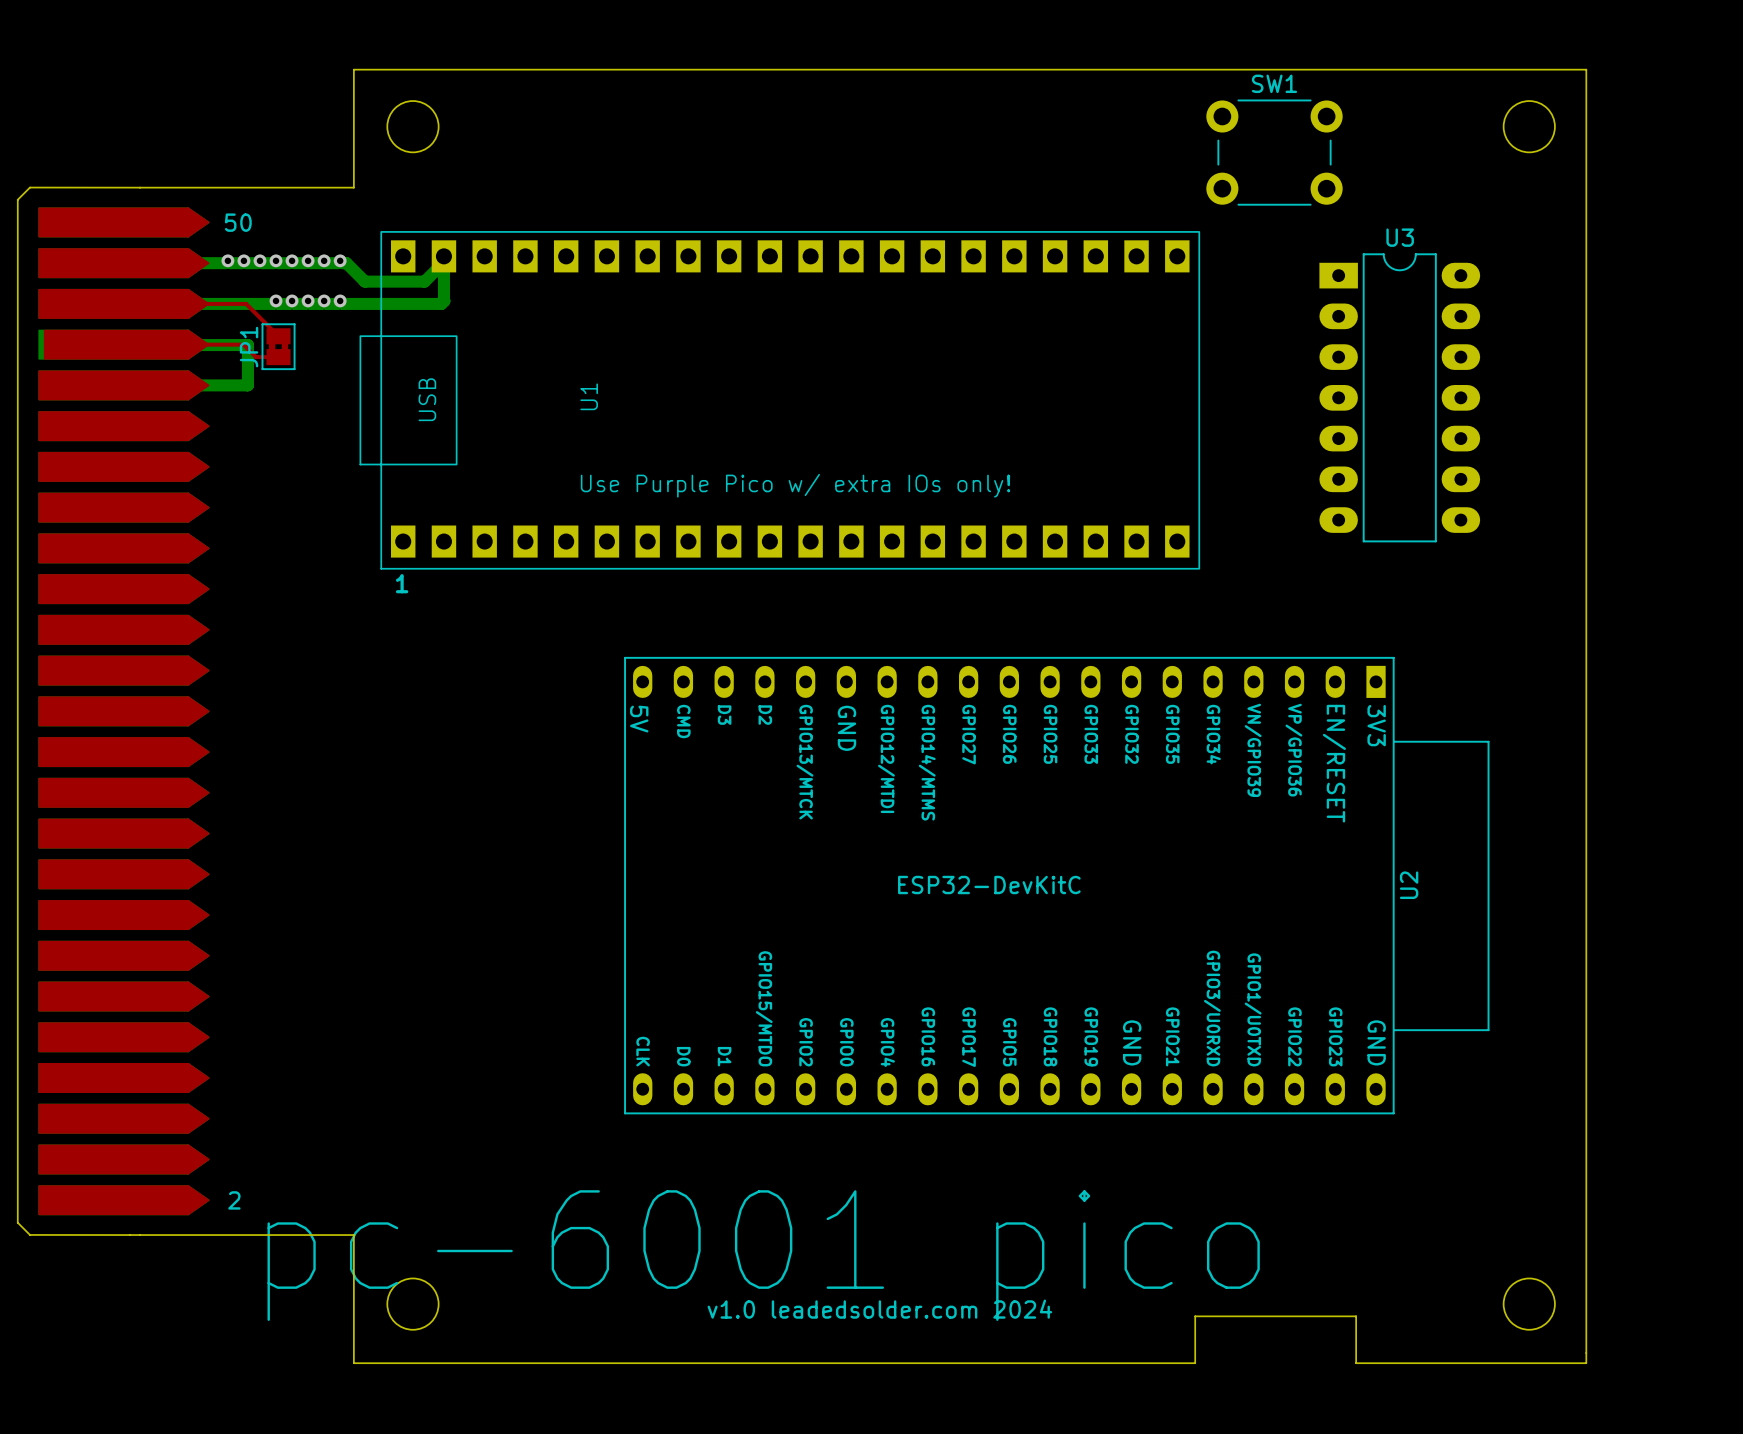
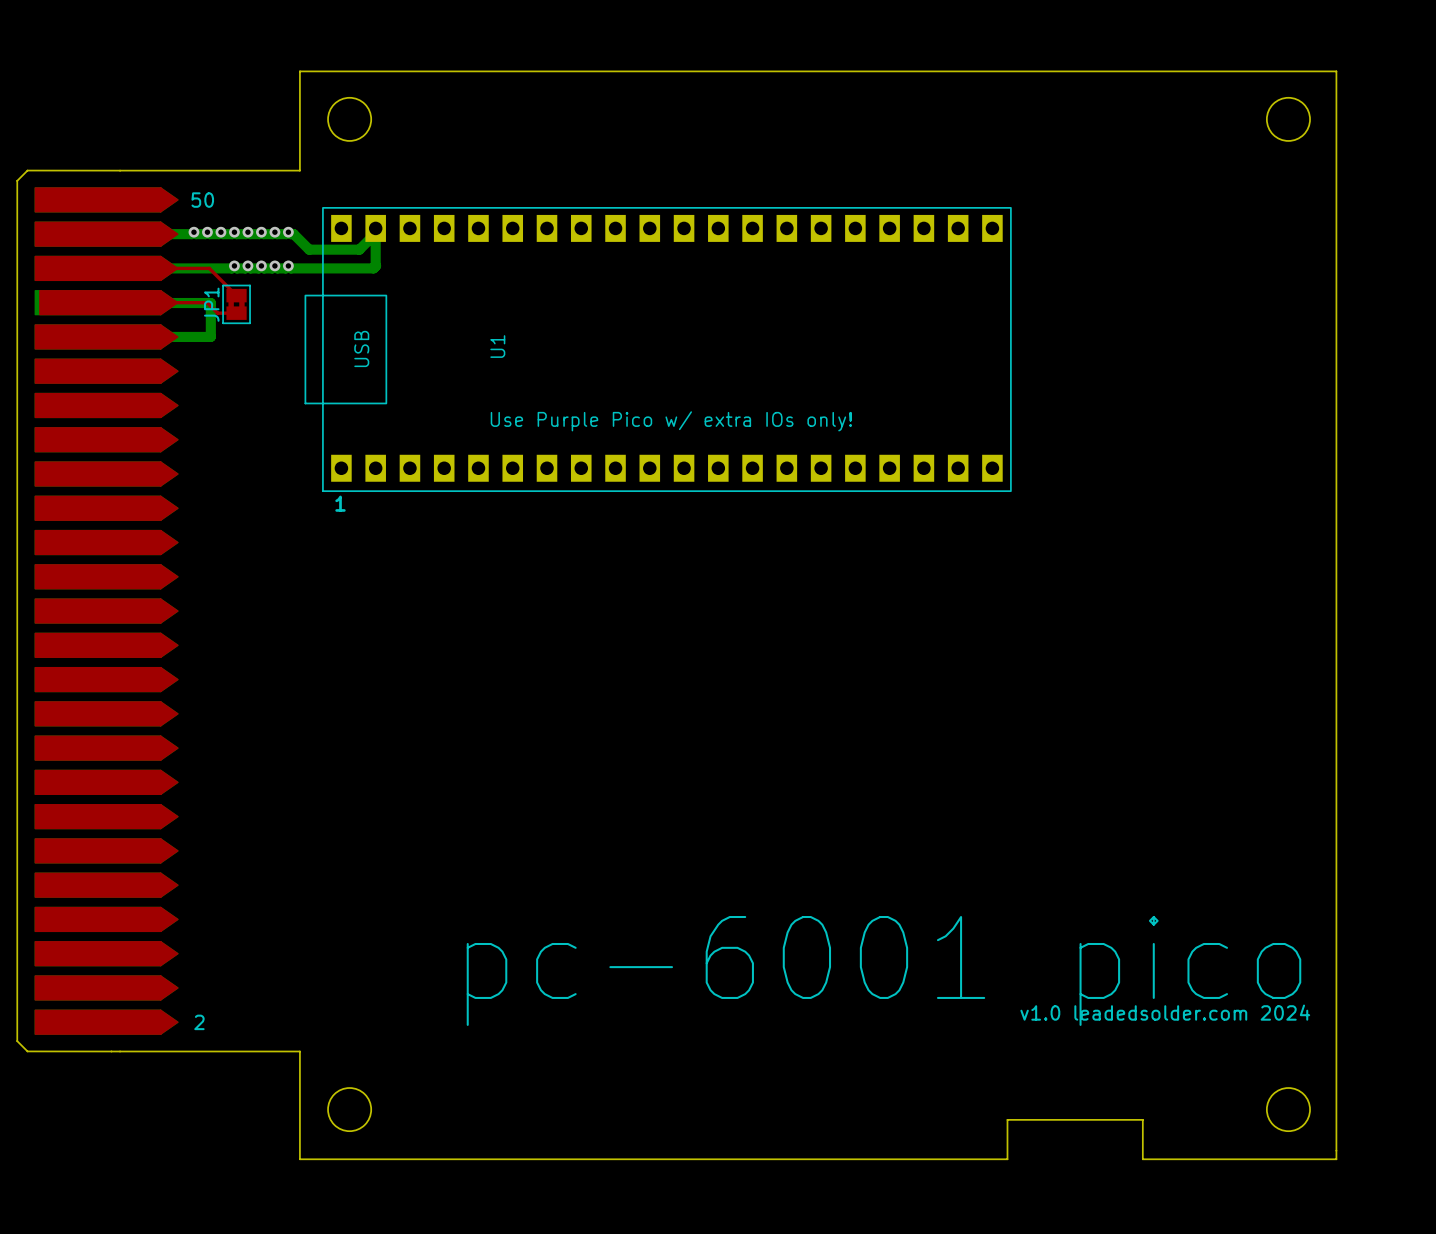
SW1: (1274, 152) -> none
U3: (1399, 397) -> none
U2: ESP32-DevKitC (1056, 885) -> none
text: none -> v1.0 leadedsolder.com 2024 (1165, 1012)
text position: pc-6001 pico (763, 1255) -> pc-6001 pico (883, 970)
text: v1.0 leadedsolder.com 2024 (879, 1309) -> none

